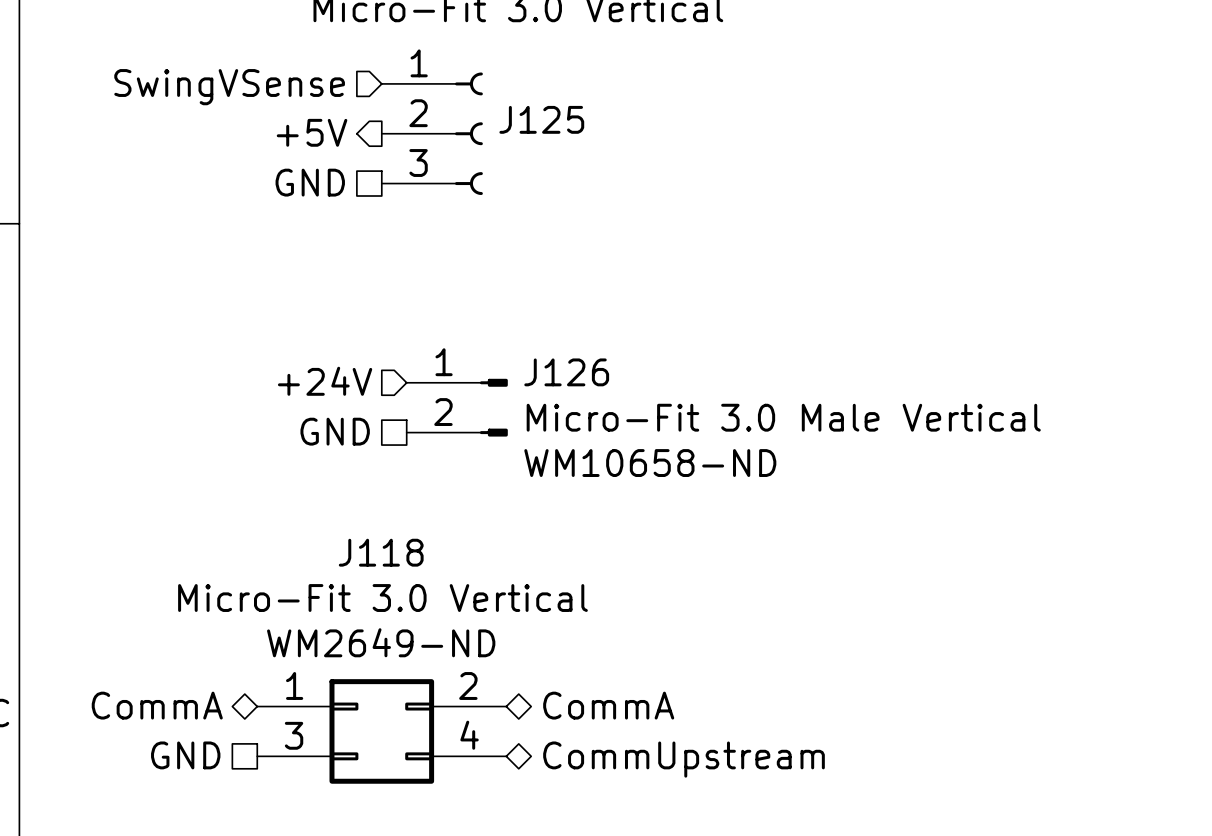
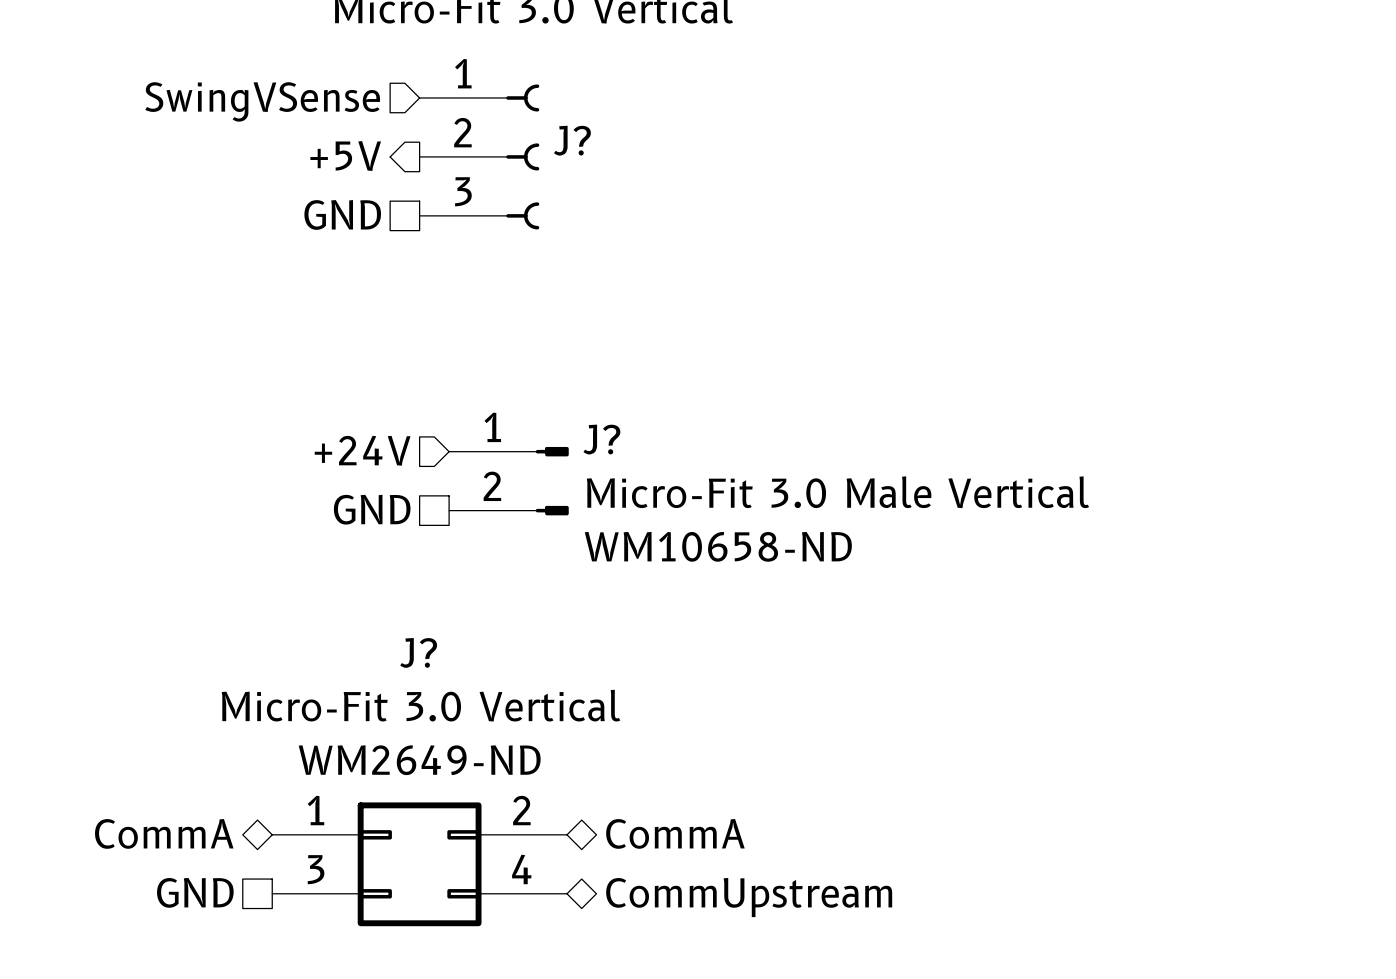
J125 name: J125 (541, 119) -> J? (572, 140)
J126 name: J126 (566, 372) -> J? (601, 439)
J118 name: J118 (381, 552) -> J? (418, 652)

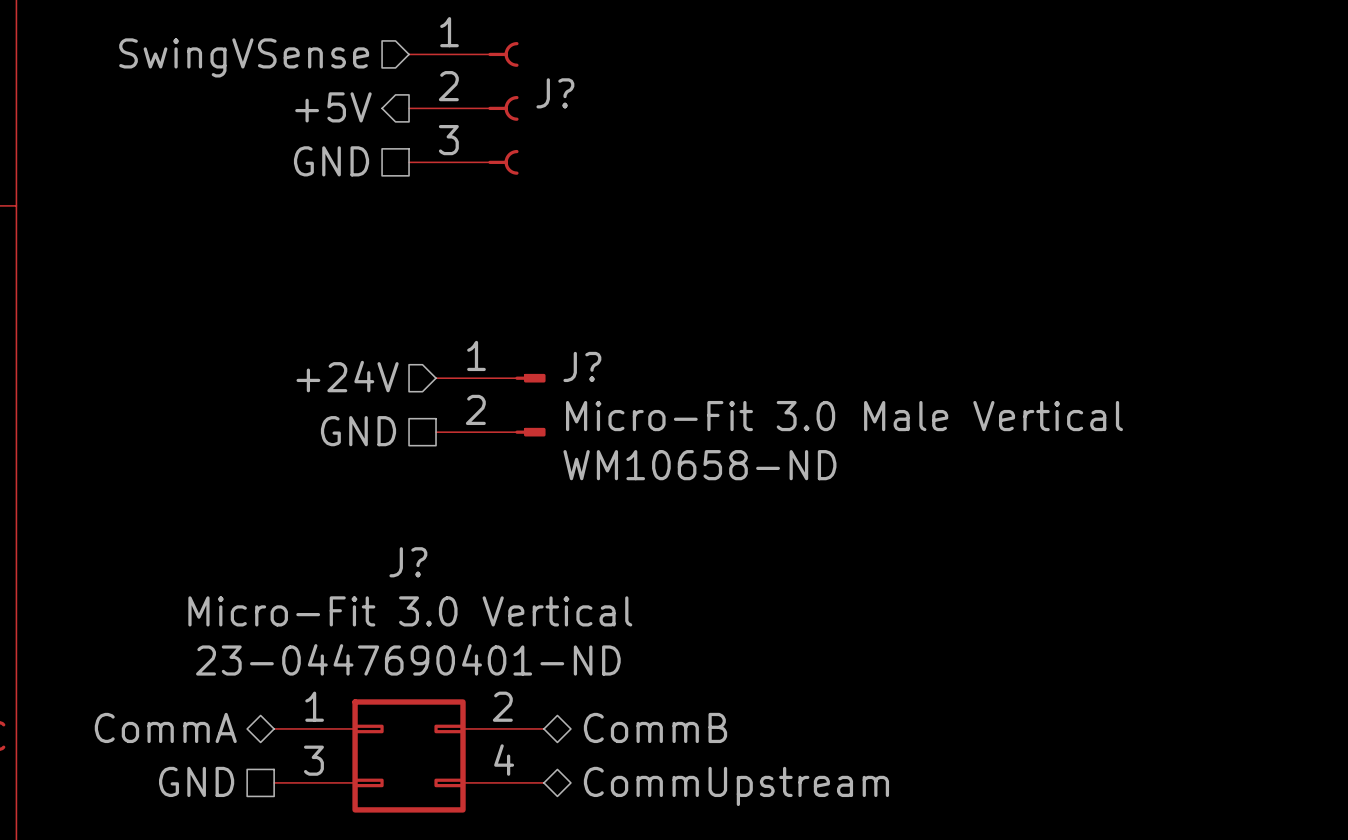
J? text: WM2649-ND (419, 760) -> 23-0447690401-ND (408, 659)
hierarchical label: CommA (675, 833) -> CommB (655, 727)

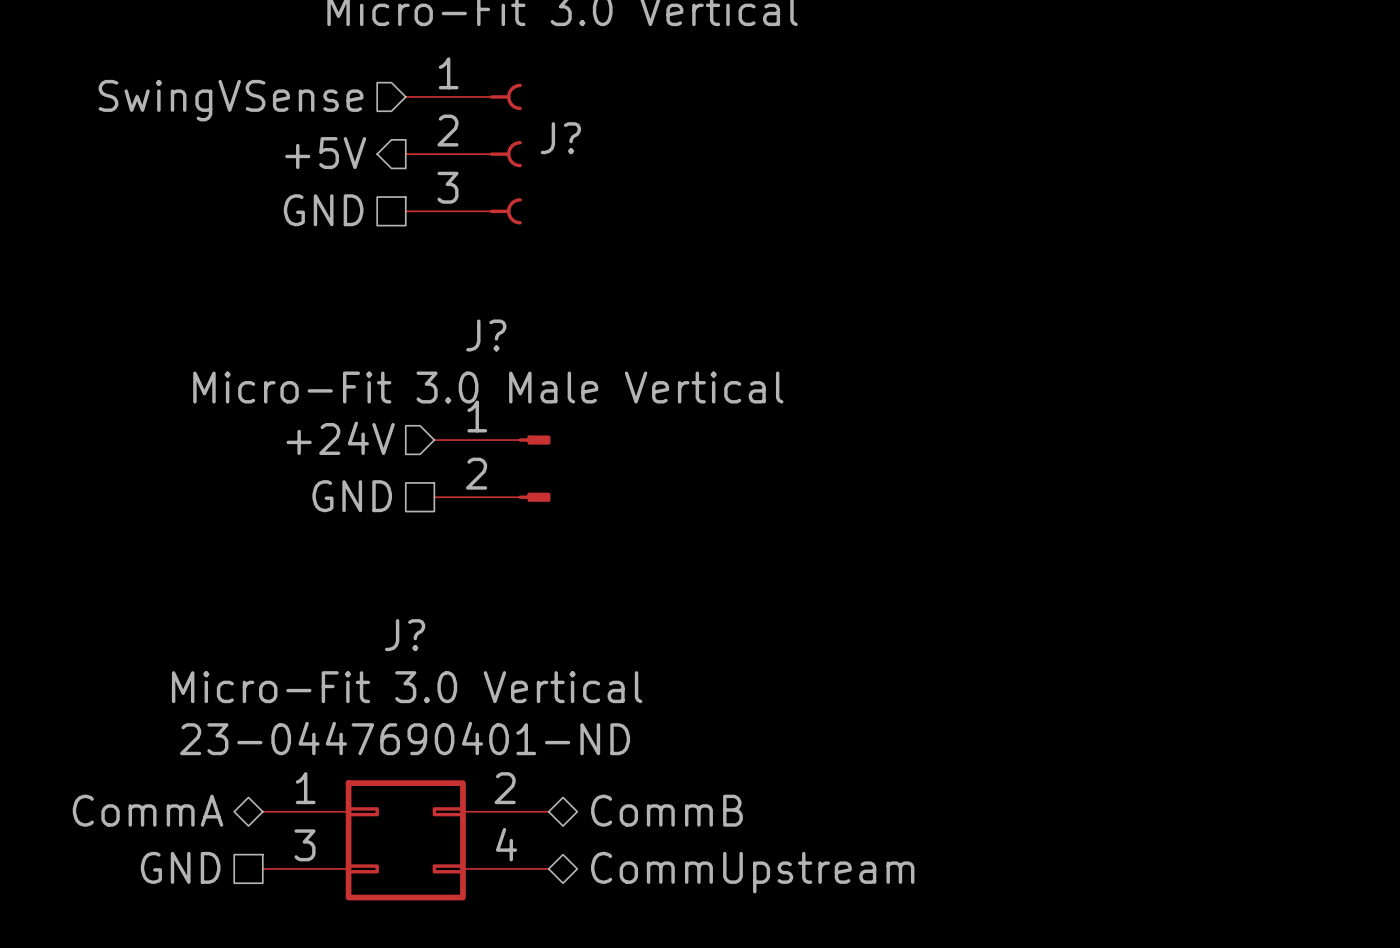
J? name position: J? (582, 366) -> J? (486, 335)
J? value position: Micro-Fit 3.0 Male Vertical (844, 416) -> Micro-Fit 3.0 Male Vertical (488, 387)
J? text: WM10658-ND (699, 465) -> none

